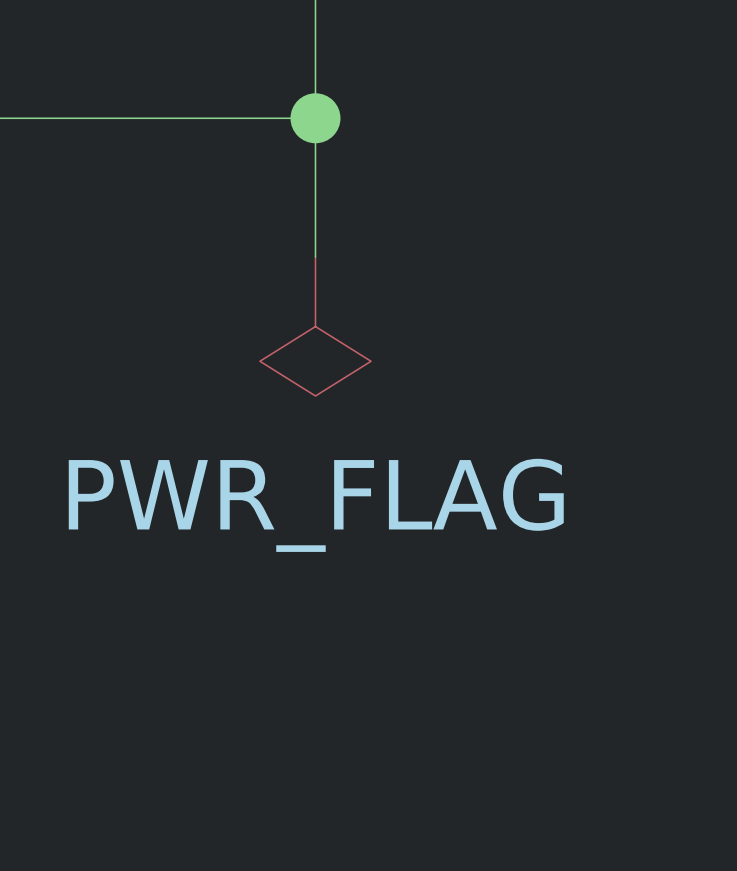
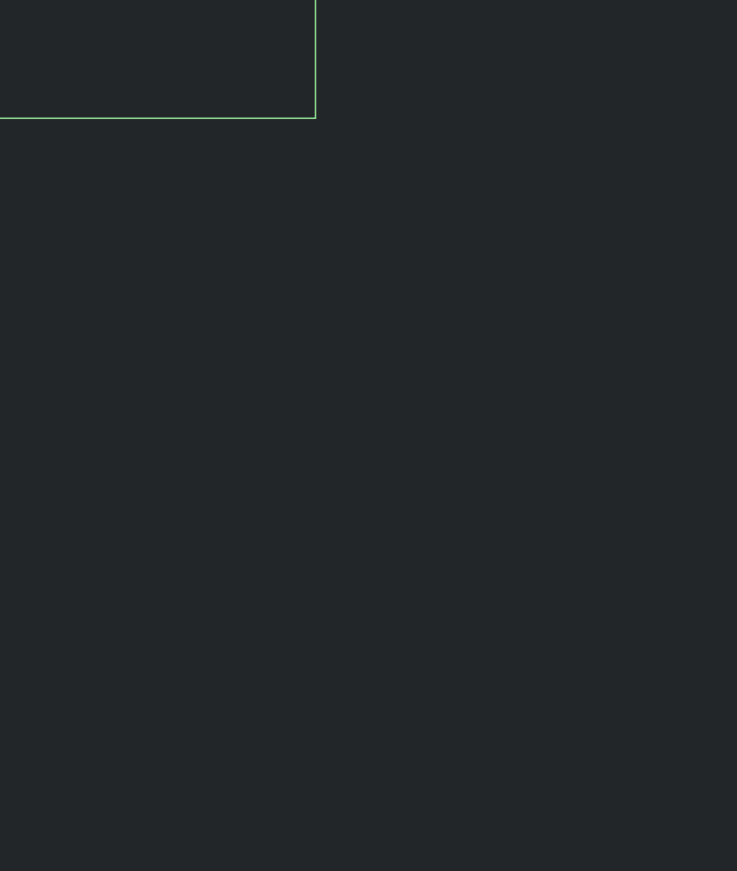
wire: (315, 118) (315, 257) -> none
junction: (315, 118) -> none
power symbol: PWR_FLAG (315, 326) -> none

